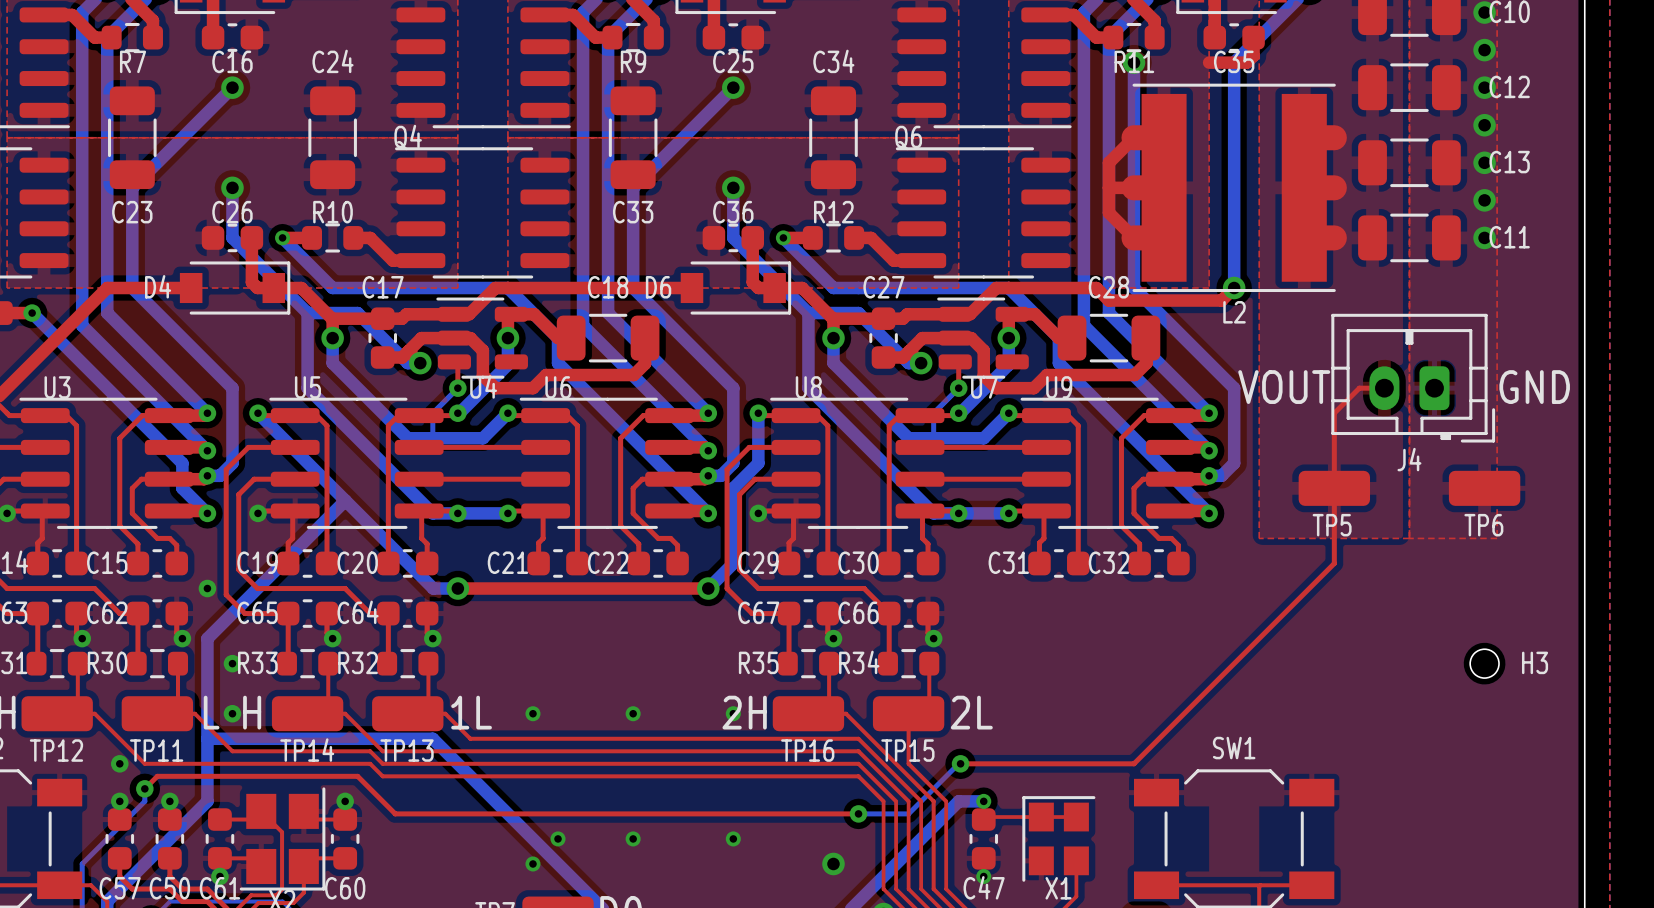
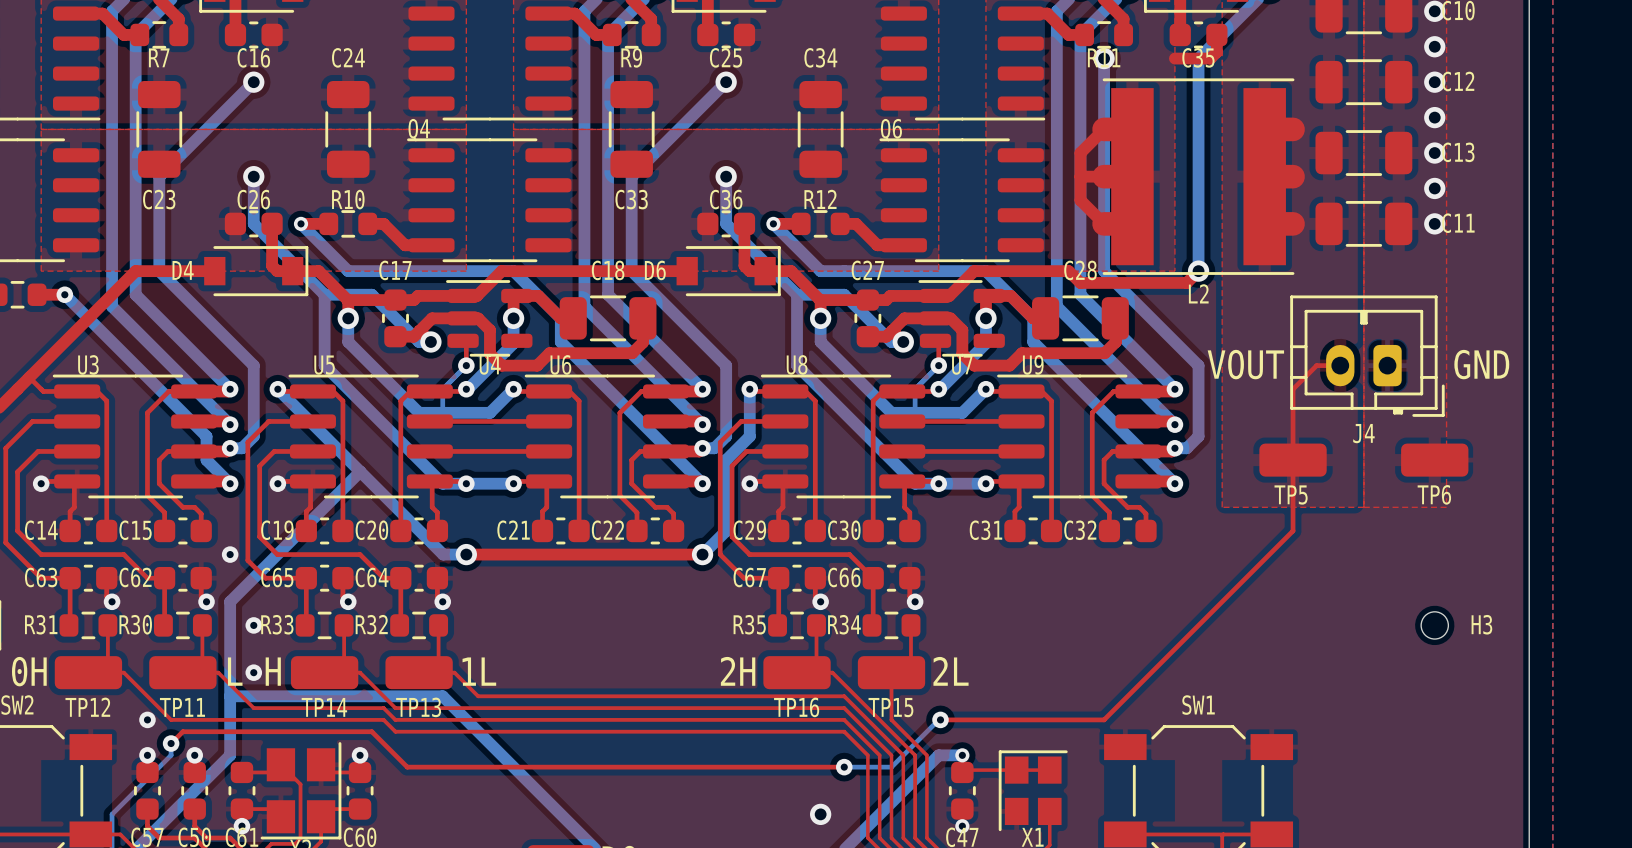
via: (532, 713) -> none
via: (633, 713) -> none
via: (733, 713) -> none
via: (558, 838) -> none
via: (633, 838) -> none
via: (733, 838) -> none
via: (532, 863) -> none

